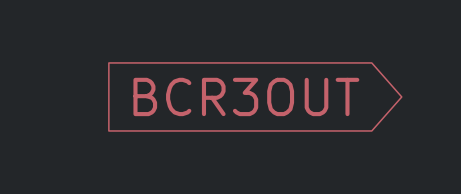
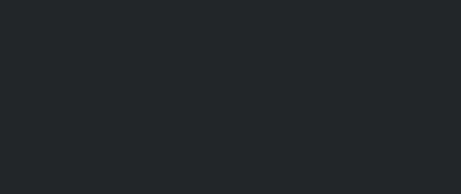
global label: BCR3OUT (246, 96) -> none

